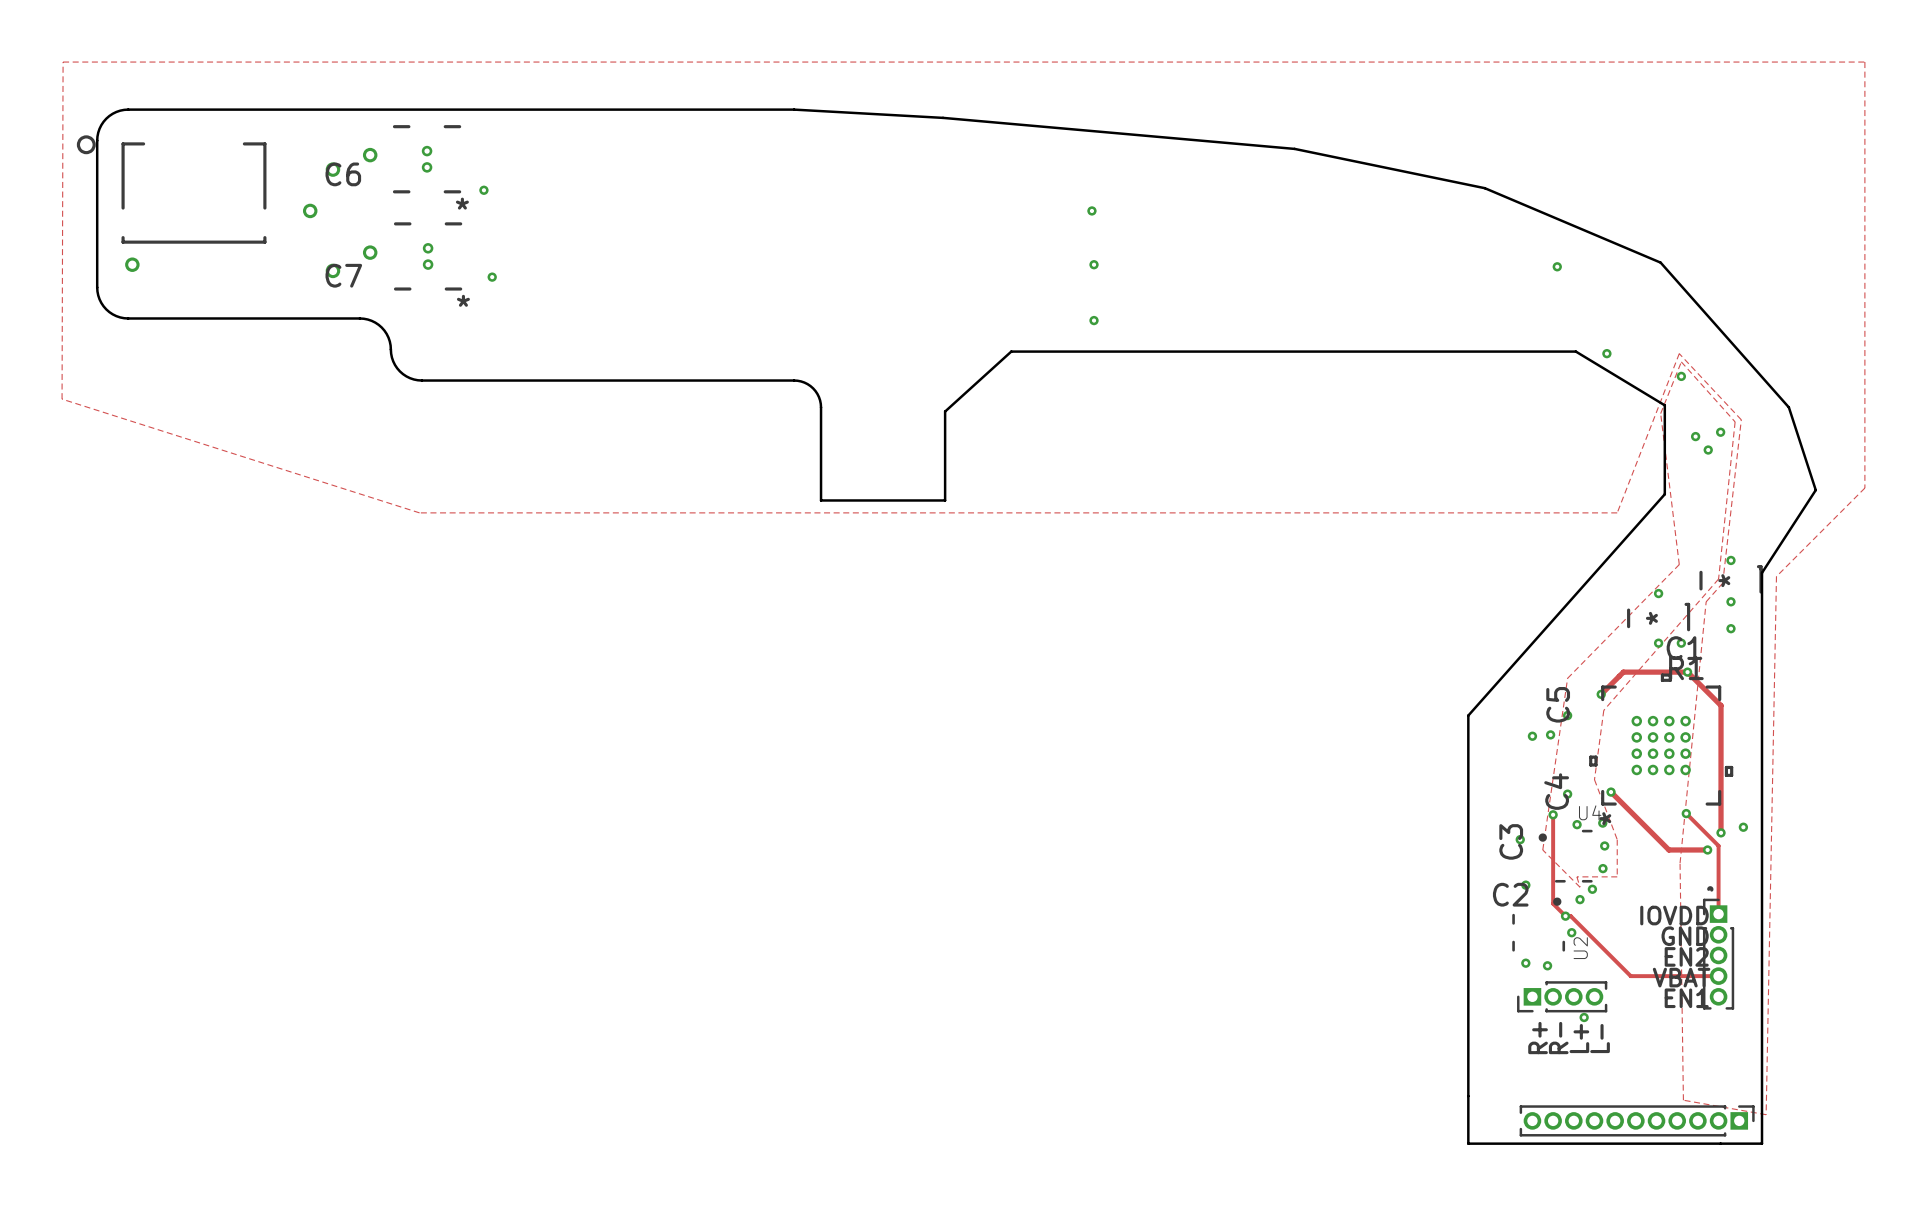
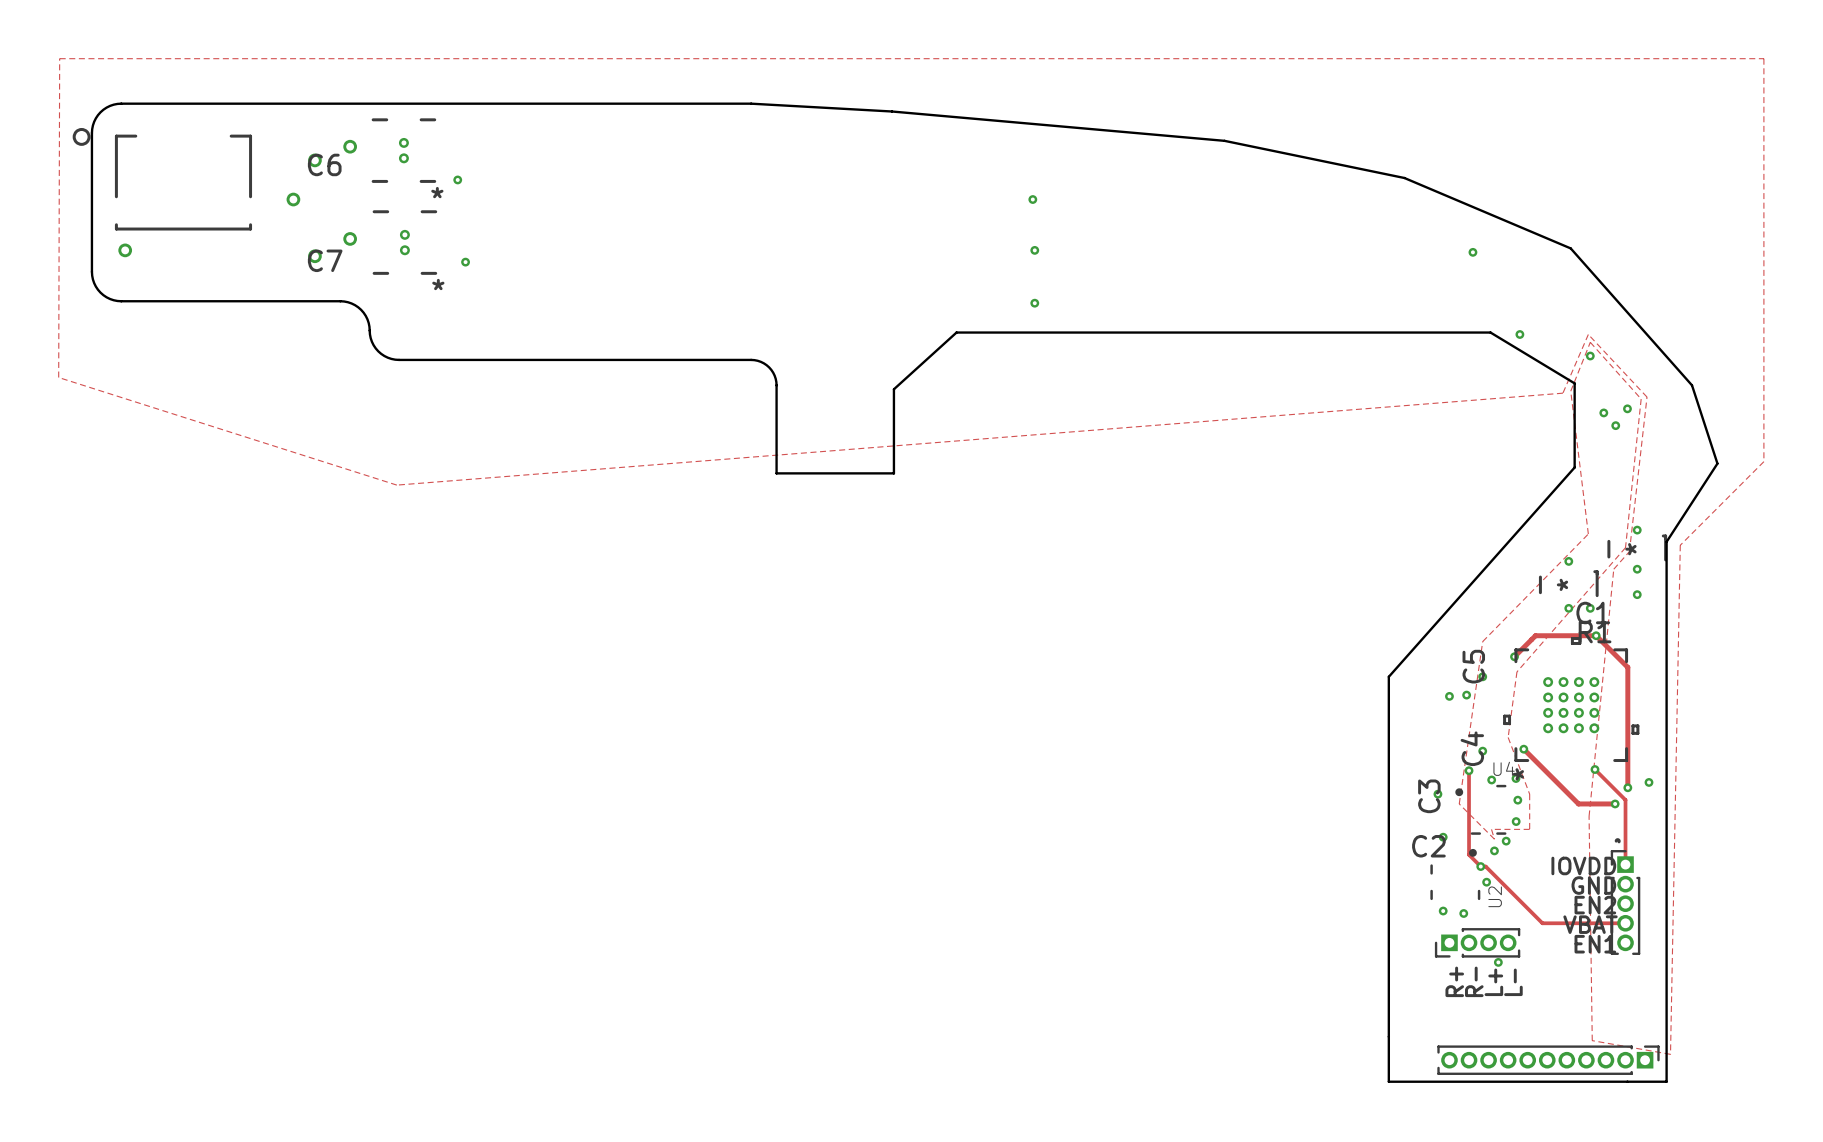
zone outline: (1679, 353) (1617, 512) (419, 512) -> (1588, 334) (1562, 393) (396, 485)

